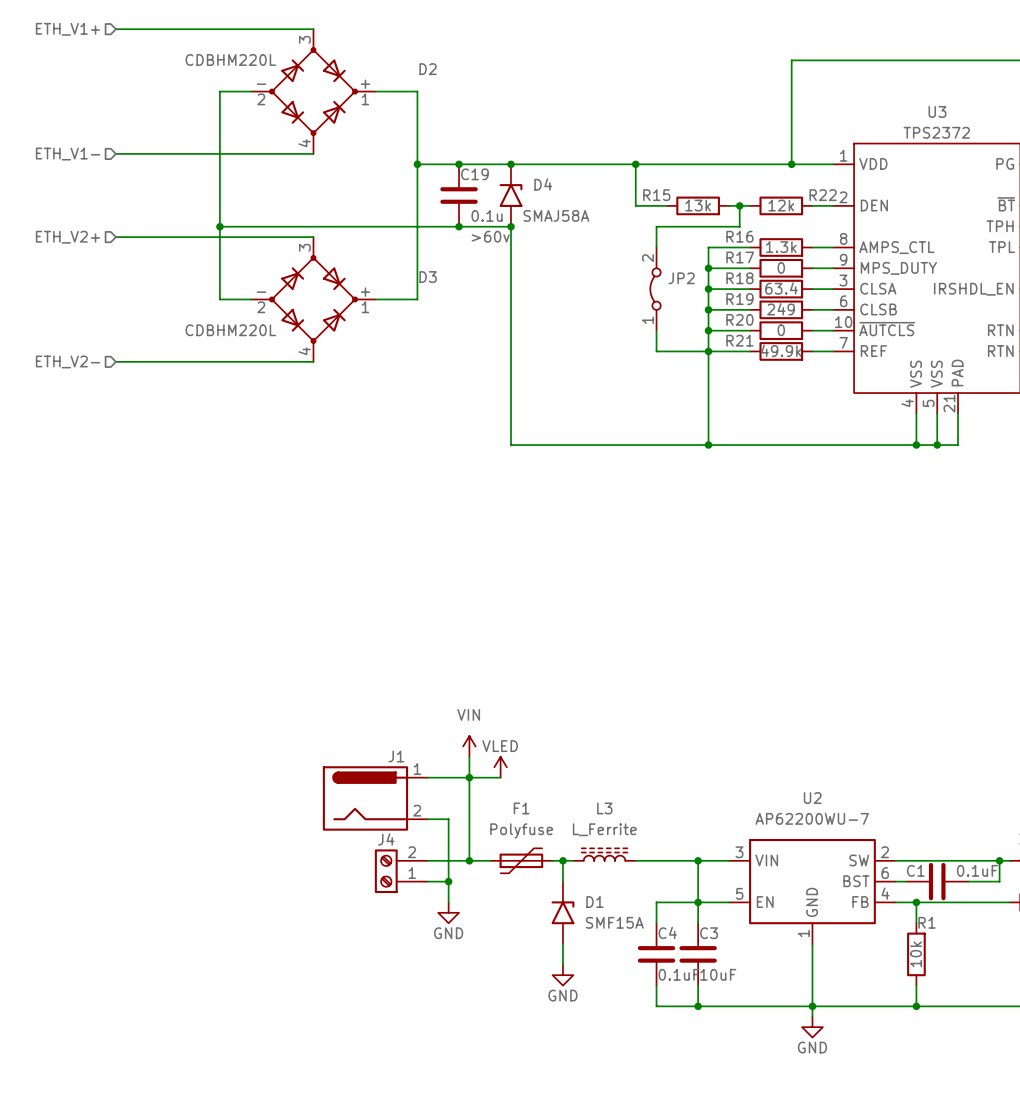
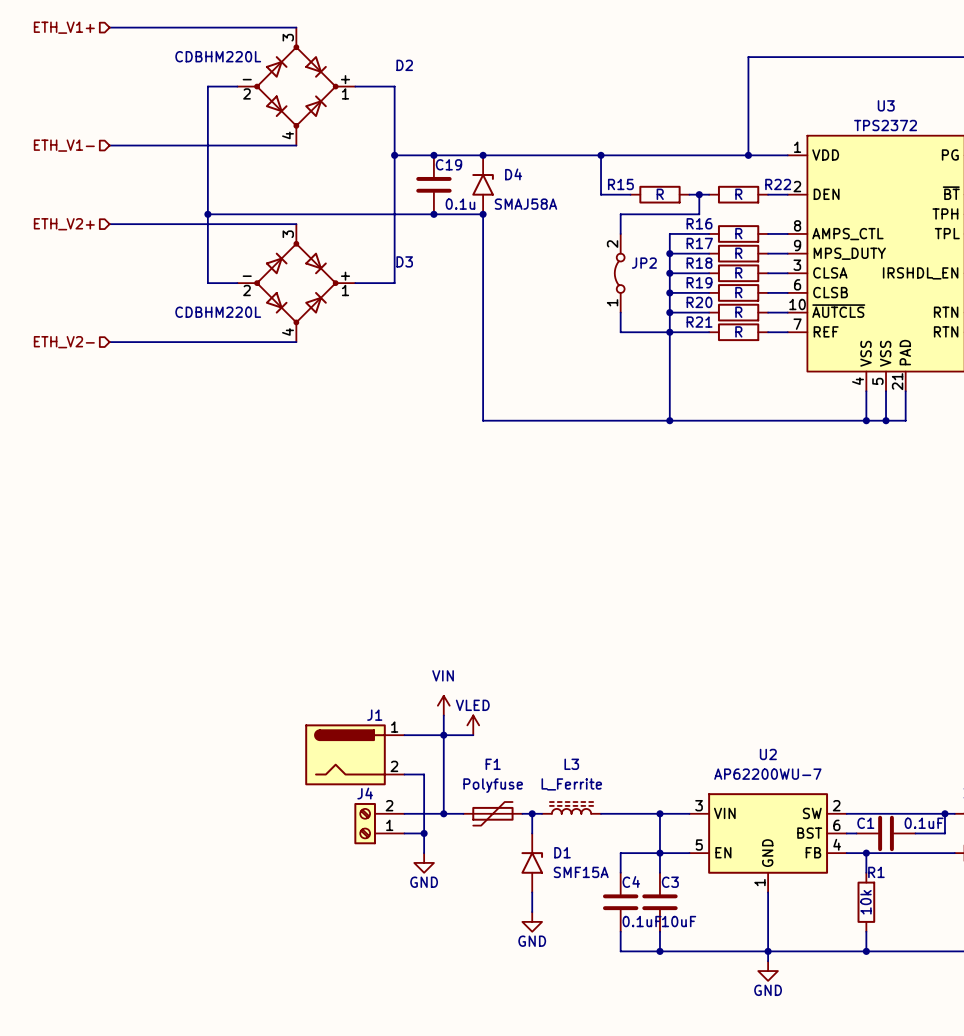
R15 value: 13k (698, 205) -> R (660, 194)
R22 value: 12k (781, 205) -> R (738, 194)
C19 text: >60v (490, 236) -> none
R16 value: 1.3k (781, 247) -> R (738, 233)
R17 value: 0 (781, 267) -> R (738, 253)
R18 value: 63.4 (781, 288) -> R (738, 272)
R19 value: 249 (781, 309) -> R (738, 292)
R20 value: 0 (781, 330) -> R (738, 312)
R21 value: 49.9k (781, 350) -> R (738, 331)

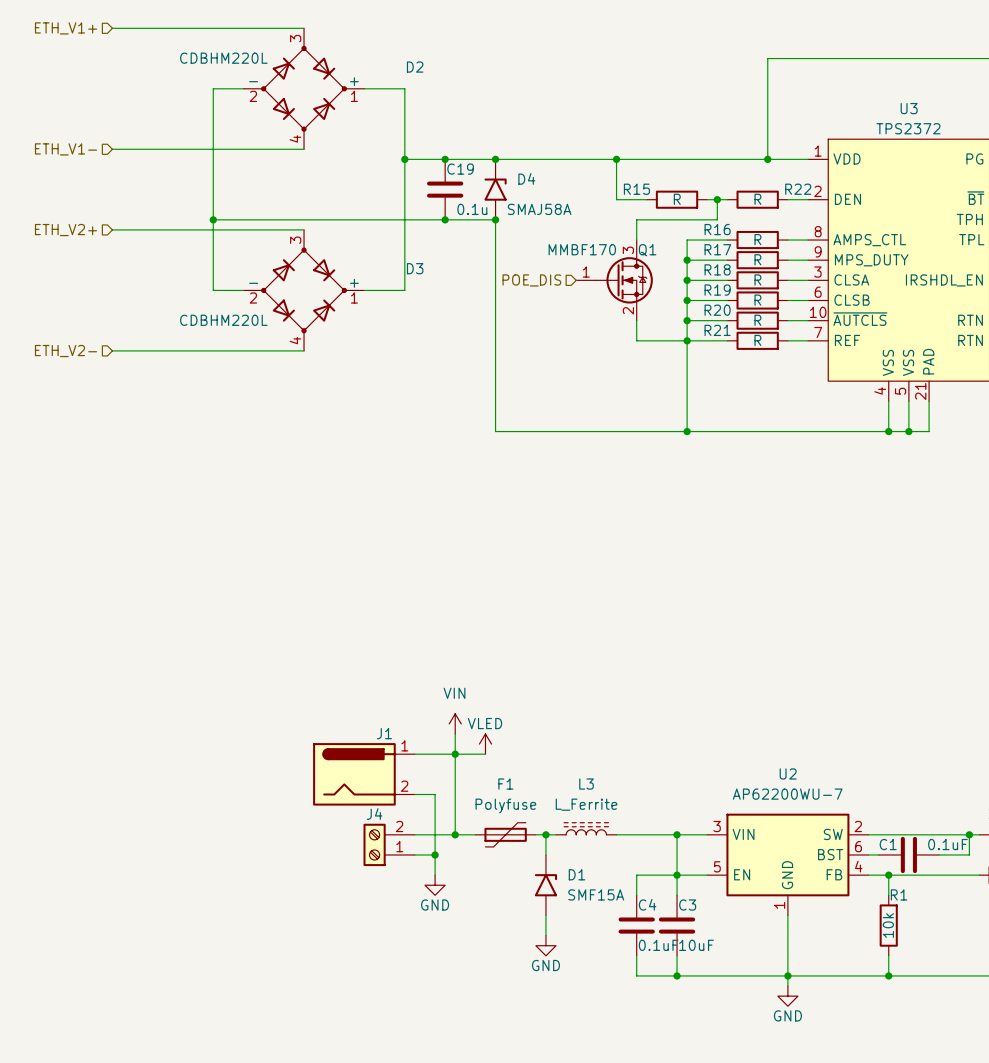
hierarchical label: none -> POE_DIS (531, 280)
Q1: none -> MMBF170 (614, 280)
JP2: (619, 273) -> none

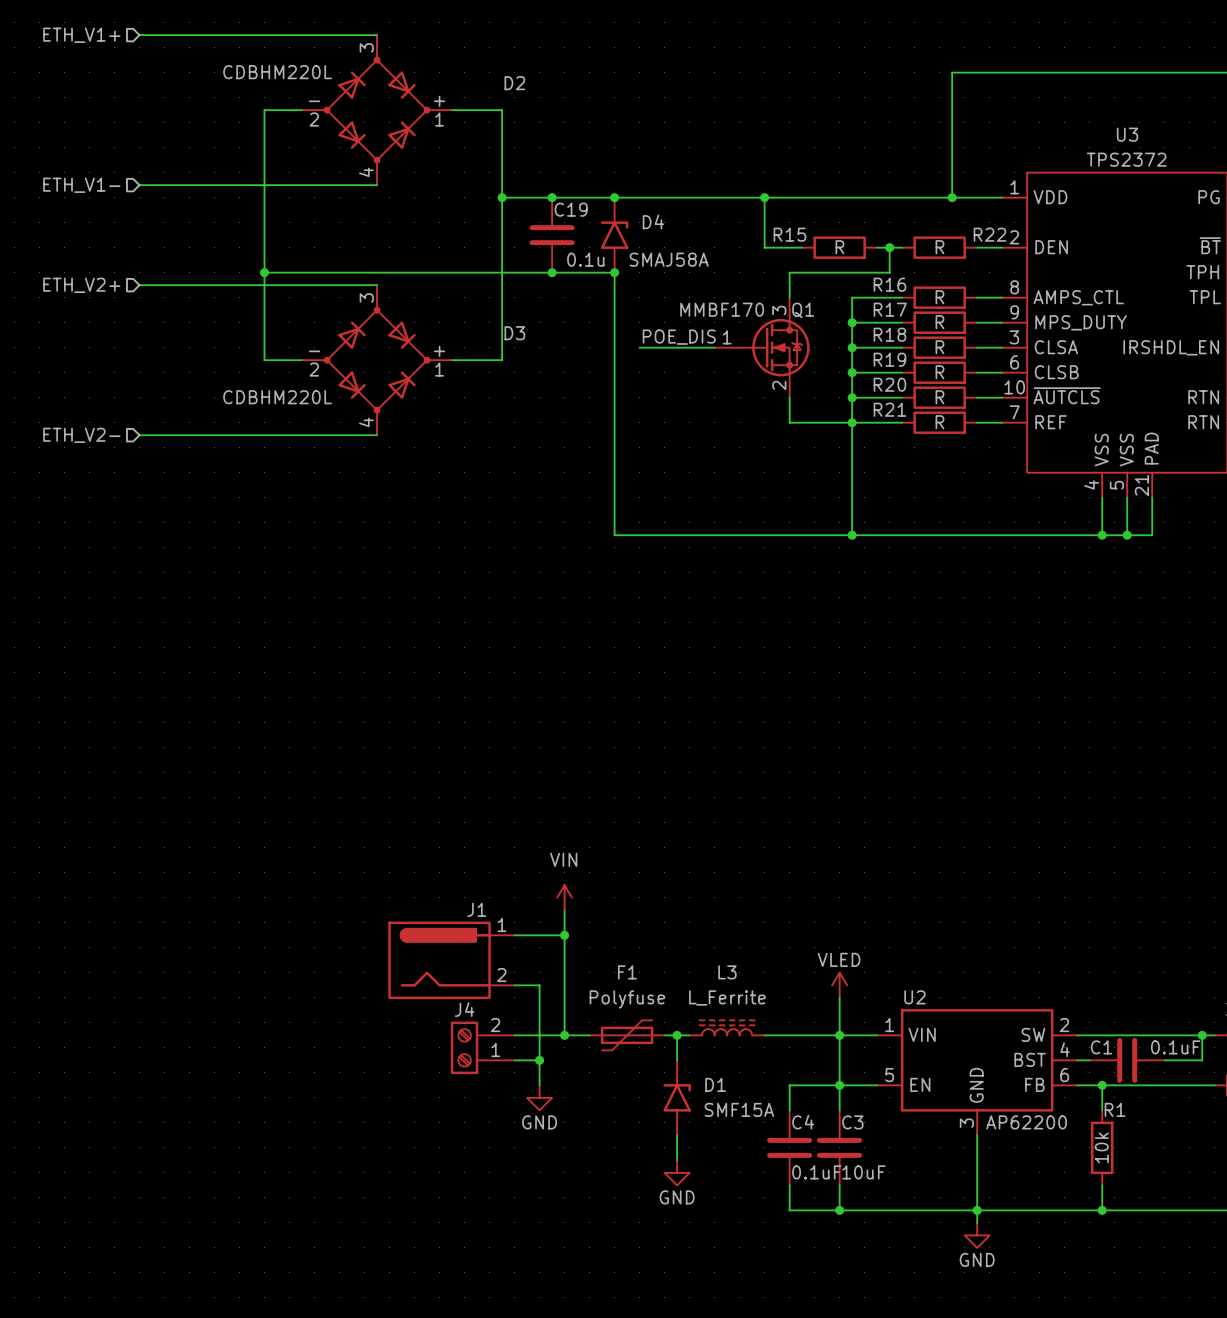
label: none -> POE_DIS (679, 337)
wire: none -> (639, 347) (714, 347)
hierarchical label: POE_DIS (531, 280) -> none
power symbol position: VLED (485, 744) -> VLED (839, 985)
wire: (455, 754) (485, 754) -> none
U2 name position: U2 (788, 773) -> U2 (914, 997)
U2 value: AP62200WU-7 (787, 794) -> AP62200 (1026, 1122)
wire: none -> (839, 997) (839, 1035)
U2 pin number: 3 (717, 826) -> 1 (889, 1025)
U2 pin number: 6 (858, 846) -> 4 (1065, 1049)
U2 pin number: 4 (858, 866) -> 6 (1064, 1075)
U2 pin number: 1 (779, 905) -> 3 (966, 1123)

